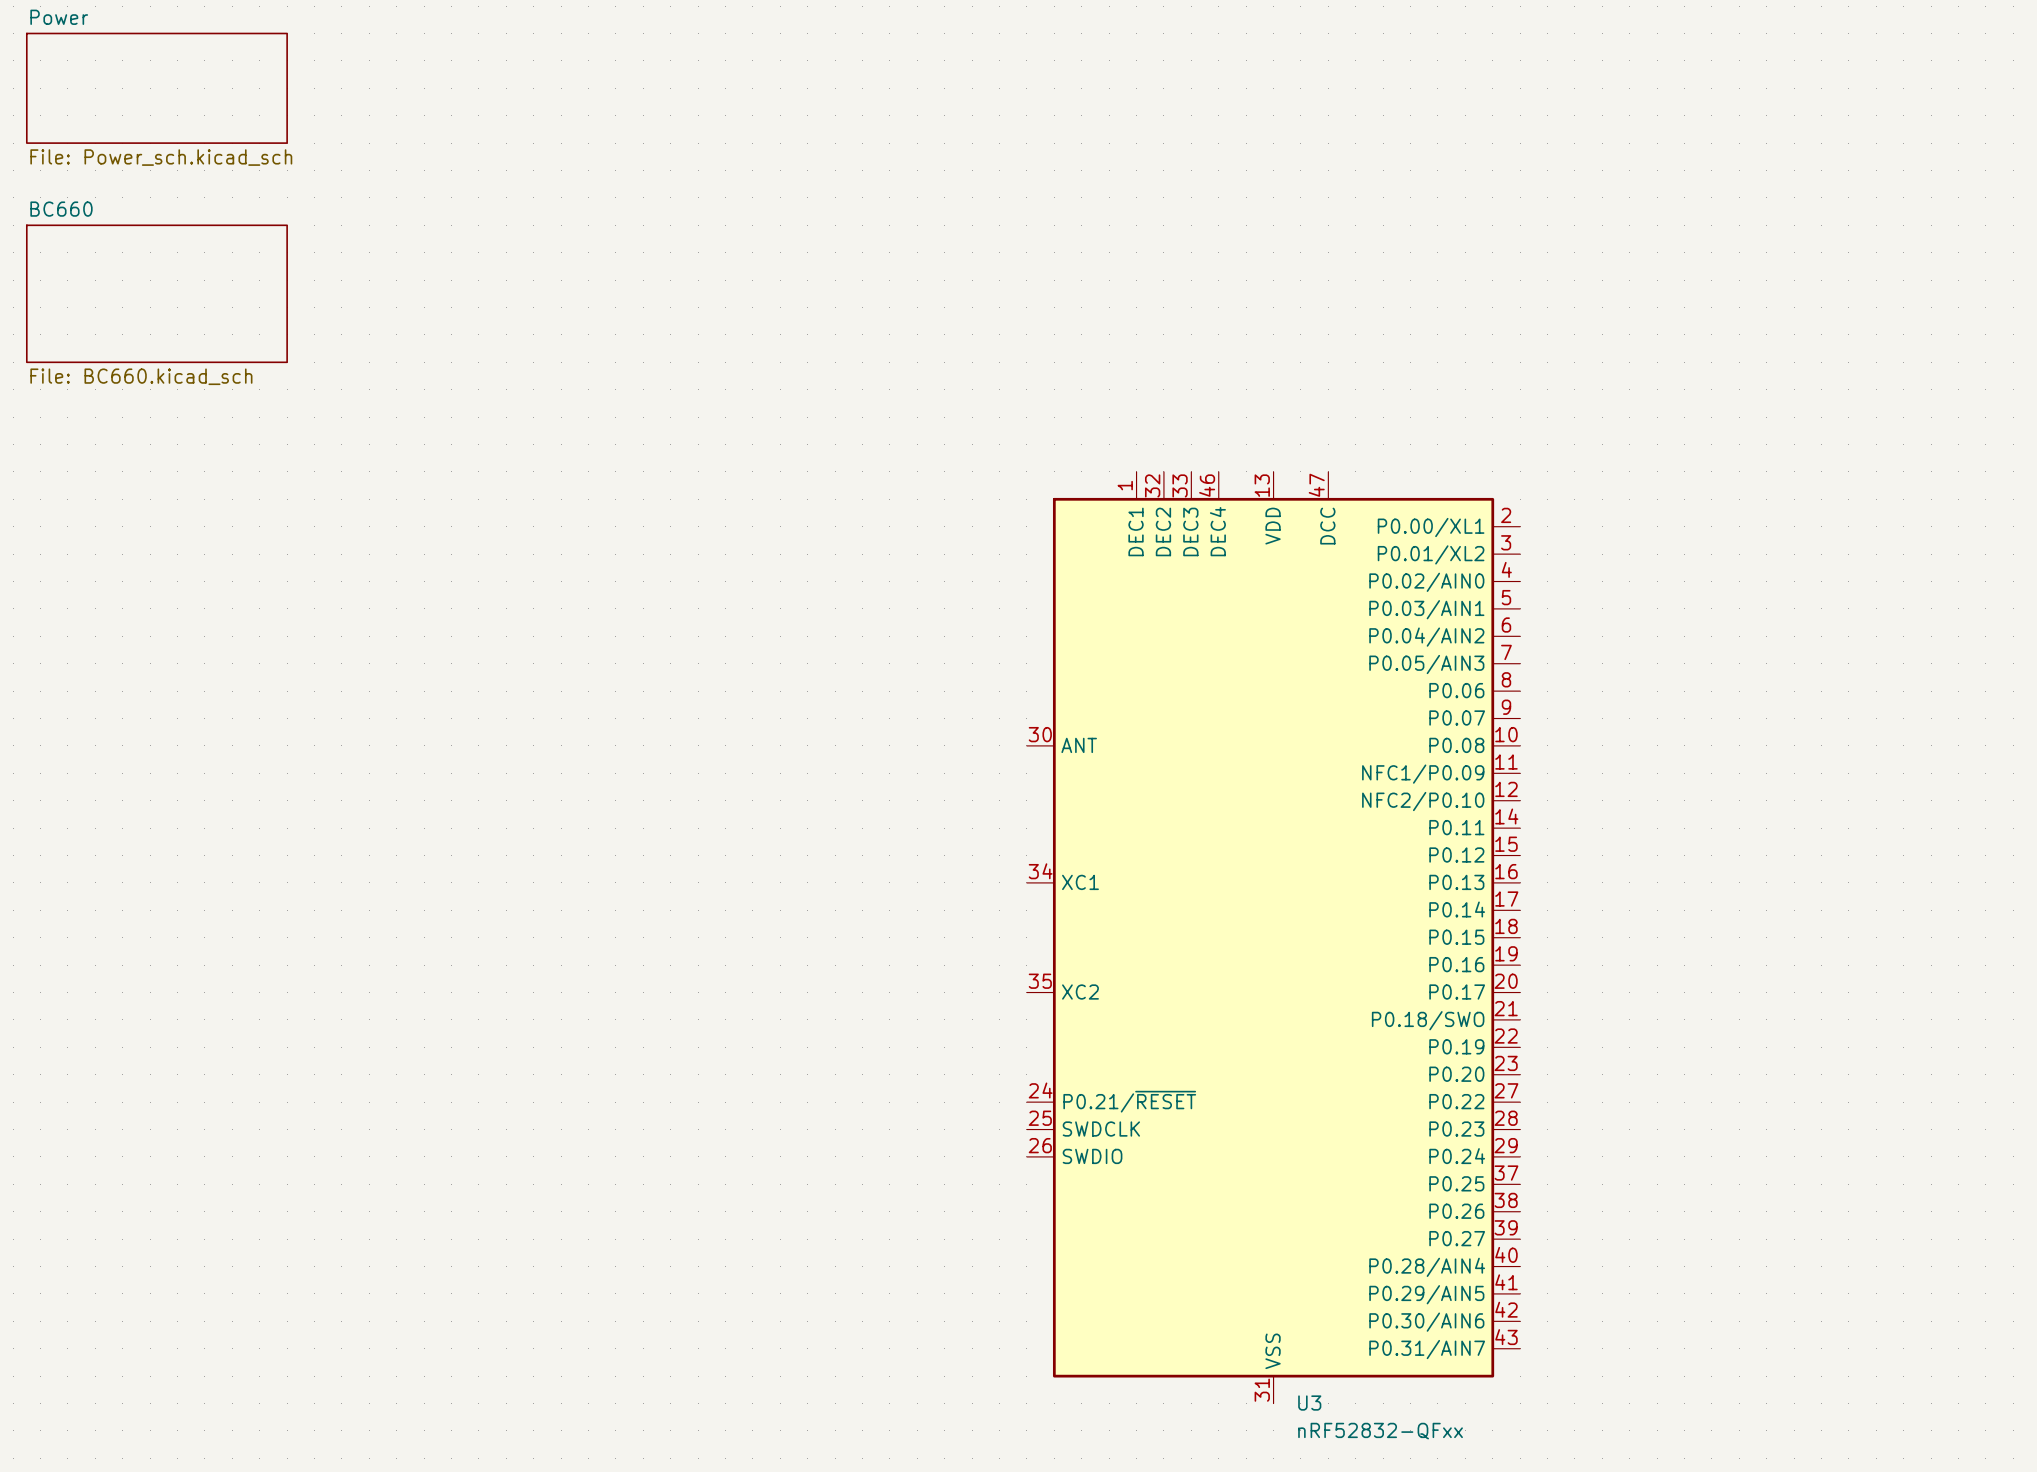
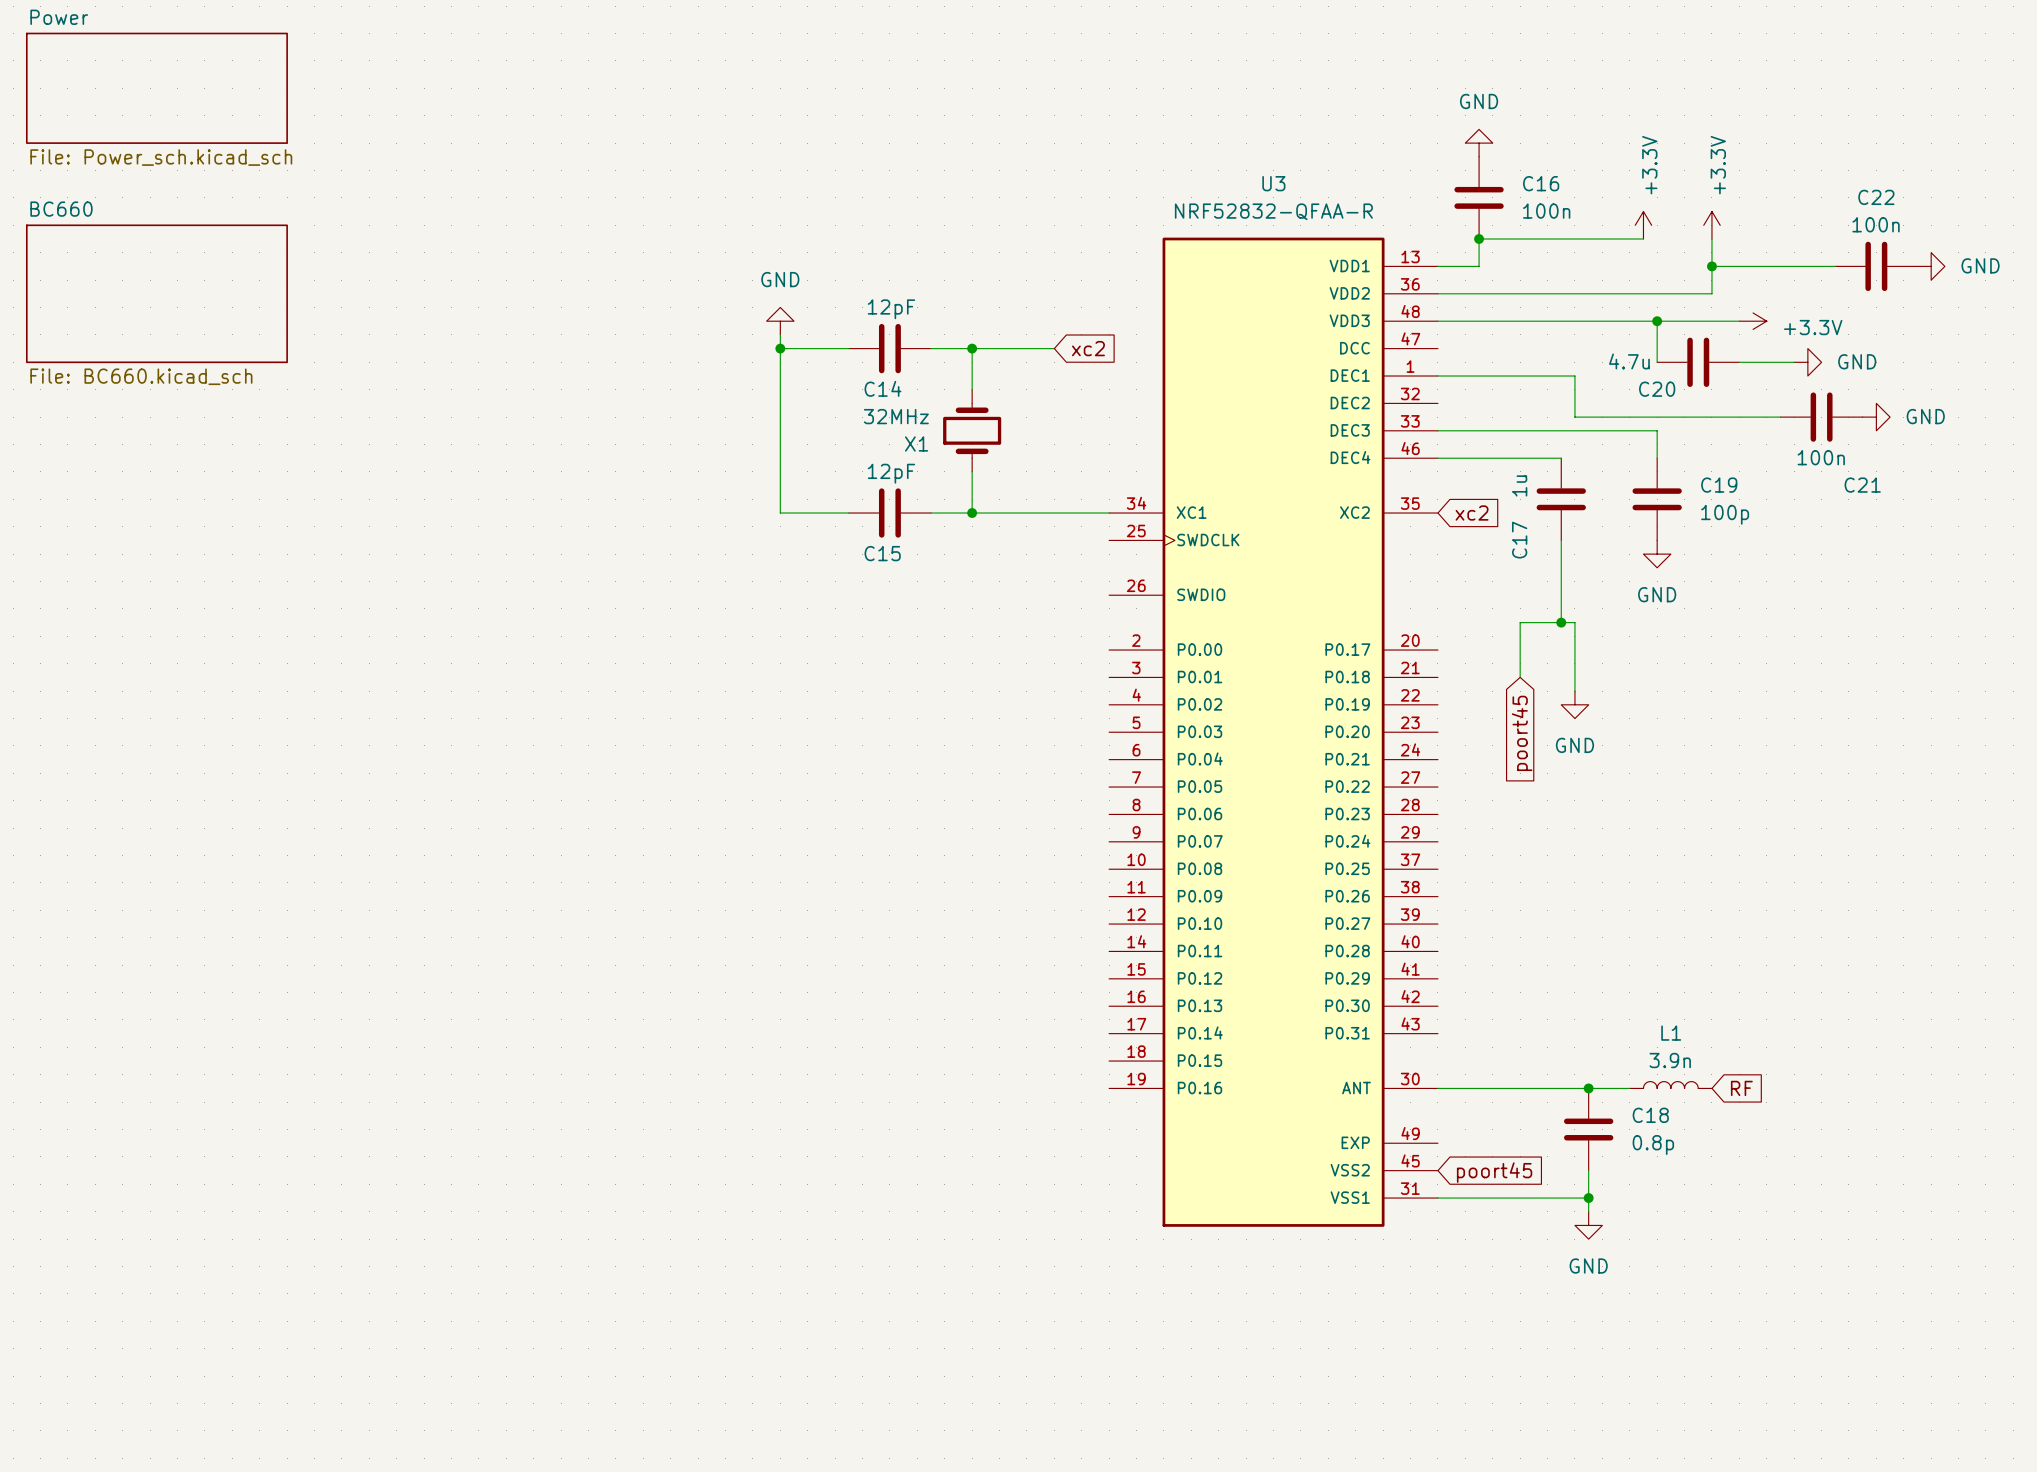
power symbol: none -> GND (1479, 143)
C16: none -> 100n (1479, 197)
power symbol: none -> +3.3V (1643, 225)
power symbol: none -> +3.3V (1711, 225)
junction: none -> (1479, 239)
wire: none -> (1643, 239) (1479, 239) (1479, 266) (1437, 266)
wire: none -> (1711, 239) (1711, 293) (1437, 293)
wire: none -> (1711, 266) (1835, 266)
junction: none -> (1711, 266)
C22: none -> 100n (1876, 266)
power symbol: none -> GND (1931, 266)
power symbol: none -> GND (780, 321)
wire: none -> (1437, 321) (1739, 321)
wire: none -> (1657, 321) (1657, 362)
junction: none -> (1657, 321)
power symbol: none -> +3.3V (1753, 321)
wire: none -> (780, 334) (780, 513) (848, 513)
wire: none -> (780, 348) (848, 348)
junction: none -> (780, 348)
C14: none -> 12pF (889, 348)
wire: none -> (931, 348) (1054, 348)
wire: none -> (972, 348) (972, 389)
junction: none -> (972, 348)
global label: none -> xc2 (1088, 348)
C20: none -> 4.7u (1698, 362)
wire: none -> (1739, 362) (1794, 362)
power symbol: none -> GND (1807, 362)
wire: none -> (1437, 376) (1574, 376) (1574, 417) (1780, 417)
C21: none -> 100n (1821, 417)
power symbol: none -> GND (1876, 417)
X1: none -> 32MHz (972, 430)
wire: none -> (1437, 430) (1657, 430) (1657, 458)
wire: none -> (1437, 458) (1561, 458)
wire: none -> (972, 471) (972, 513)
U3 symbol: [1026, 471, 1521, 1404] -> [1109, 237, 1438, 1227]
C17: none -> 1u (1561, 499)
C19: none -> 100p (1657, 499)
C15: none -> 12pF (889, 513)
wire: none -> (931, 513) (1109, 513)
junction: none -> (972, 513)
global label: none -> xc2 (1472, 513)
wire: none -> (1561, 540) (1561, 622)
power symbol: none -> GND (1657, 554)
junction: none -> (1561, 622)
wire: none -> (1520, 677) (1520, 622) (1574, 622) (1574, 691)
power symbol: none -> GND (1574, 704)
global label: none -> poort45 (1522, 733)
L1: none -> 3.9n (1670, 1085)
wire: none -> (1437, 1088) (1629, 1088)
junction: none -> (1588, 1088)
global label: none -> RF (1741, 1088)
C18: none -> 0.8p (1588, 1129)
wire: none -> (1588, 1170) (1588, 1211)
global label: none -> poort45 (1494, 1172)
wire: none -> (1437, 1198) (1588, 1198)
junction: none -> (1588, 1198)
power symbol: none -> GND (1588, 1225)
U3 name position: U3 (1309, 1403) -> U3 (1273, 183)
U3 value: nRF52832-QFxx (1380, 1431) -> NRF52832-QFAA-R (1273, 211)

